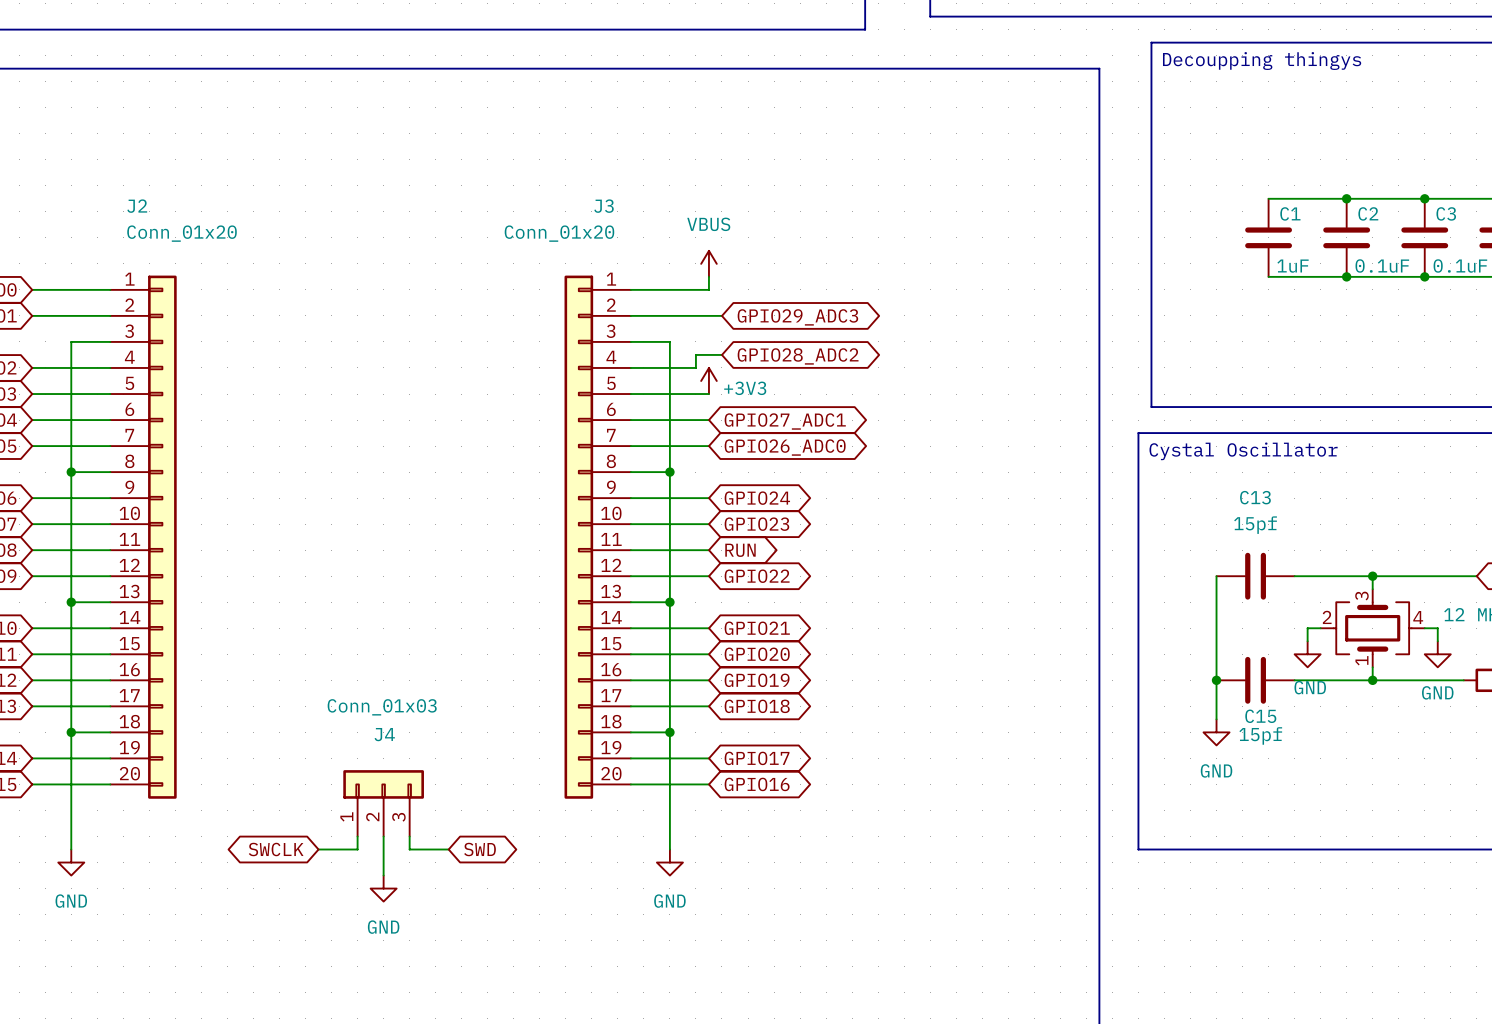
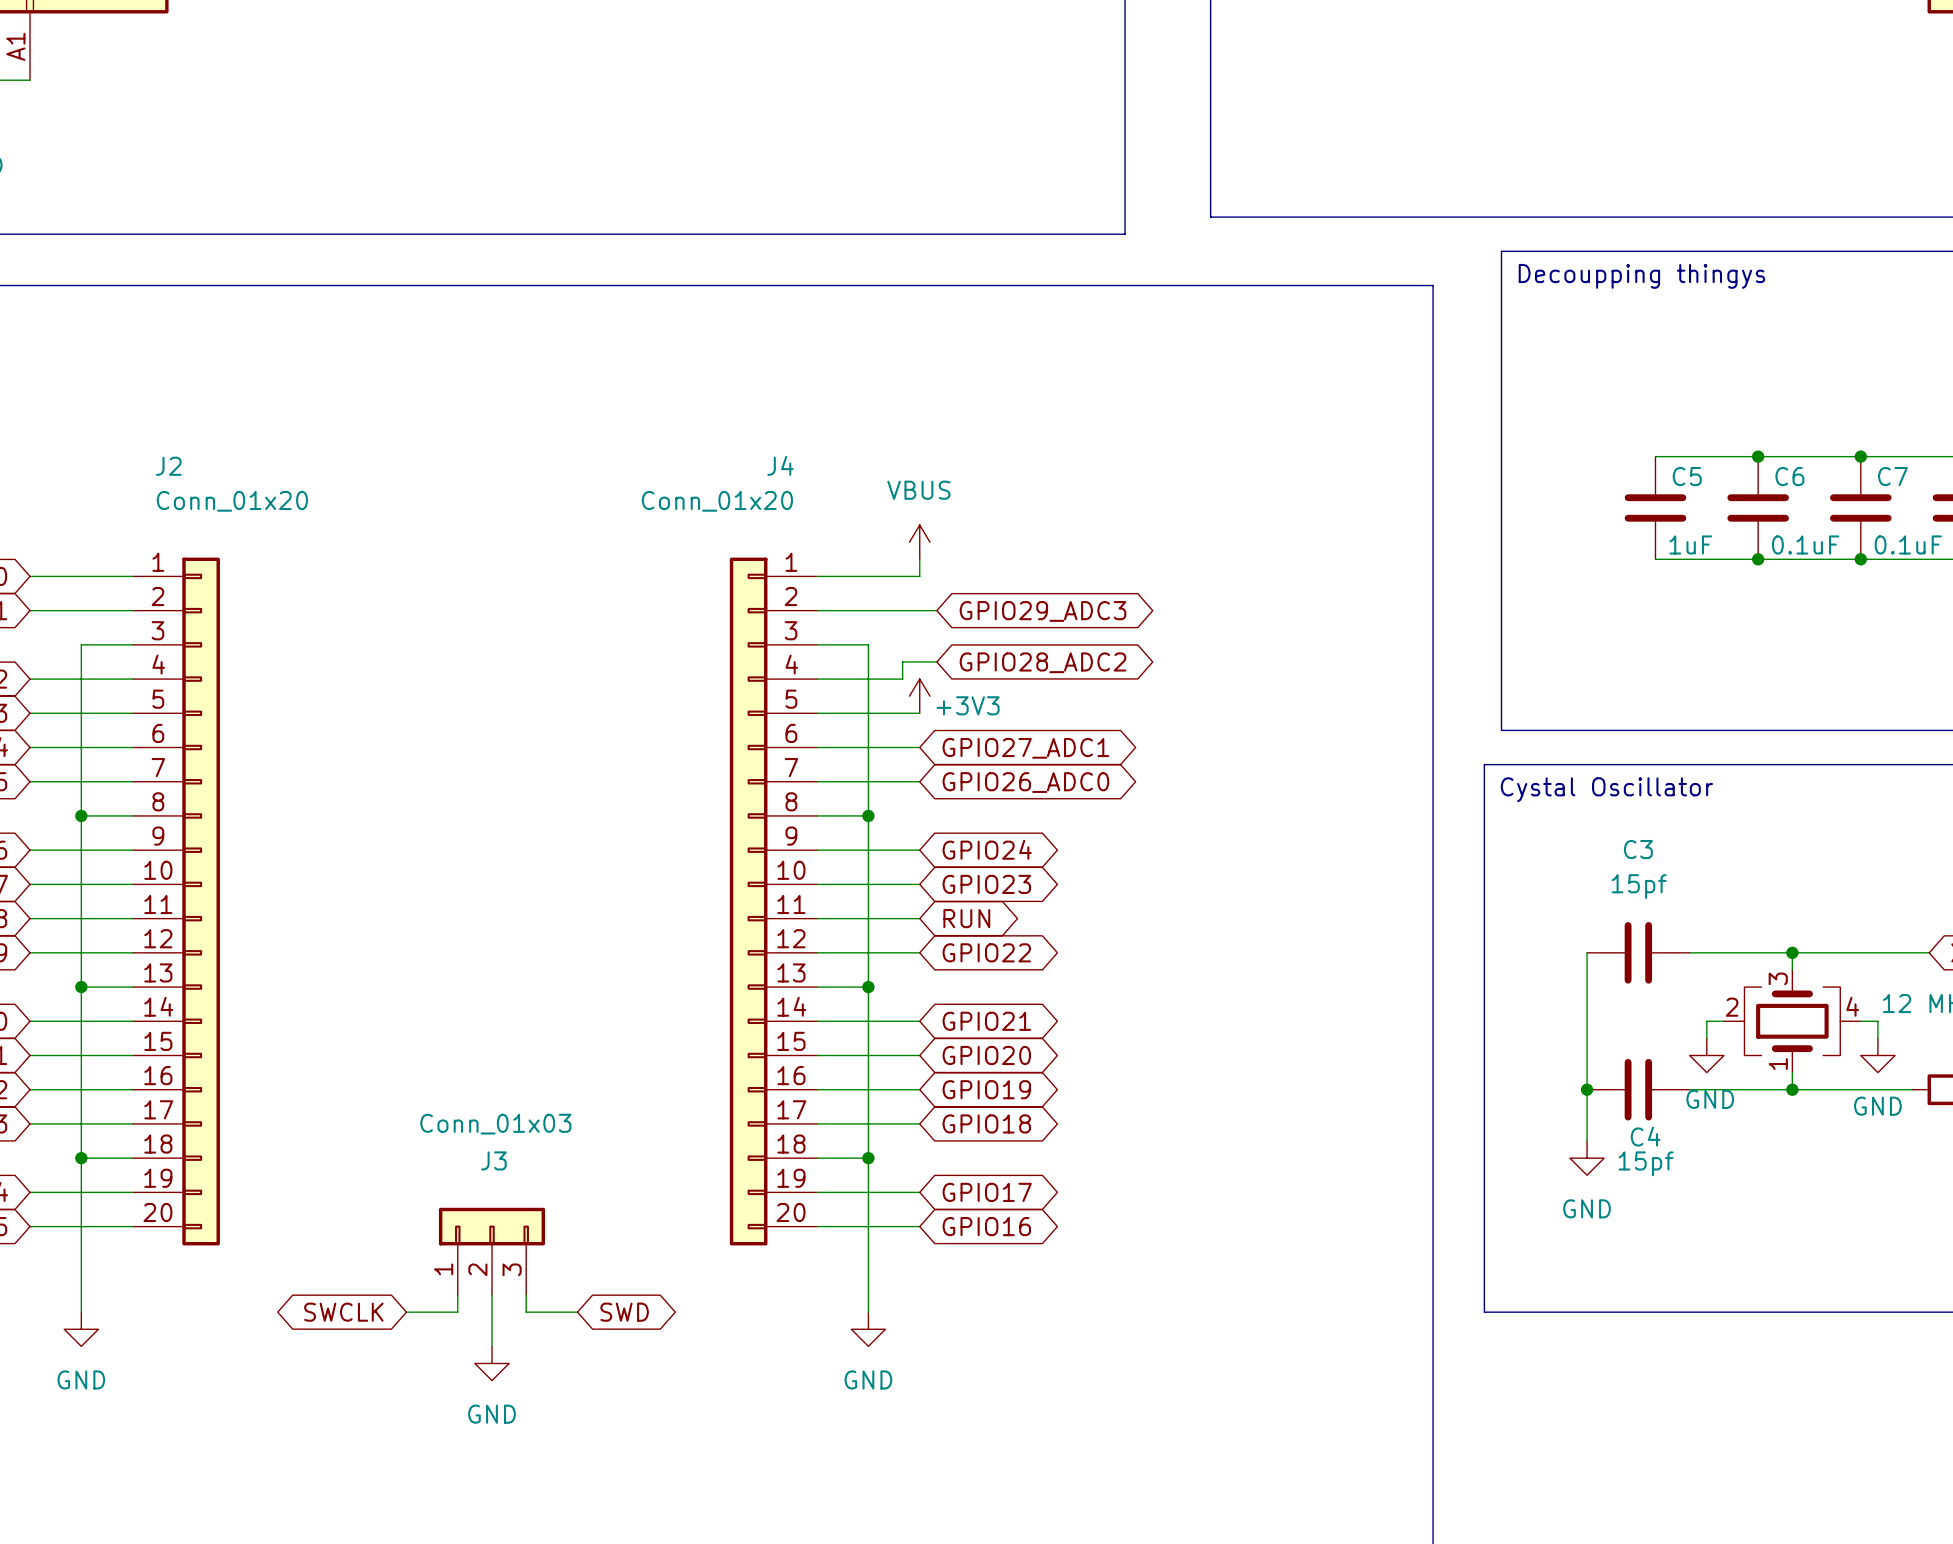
J3 name: J3 (604, 206) -> J4 (780, 465)
C1 name: C1 (1290, 213) -> C5 (1687, 476)
C2 name: C2 (1368, 213) -> C6 (1789, 476)
C3 name: C3 (1446, 213) -> C7 (1892, 476)
C13 name: C13 (1255, 497) -> C3 (1638, 849)
C15 name: C15 (1260, 716) -> C4 (1645, 1136)
J4 name: J4 (384, 734) -> J3 (493, 1160)

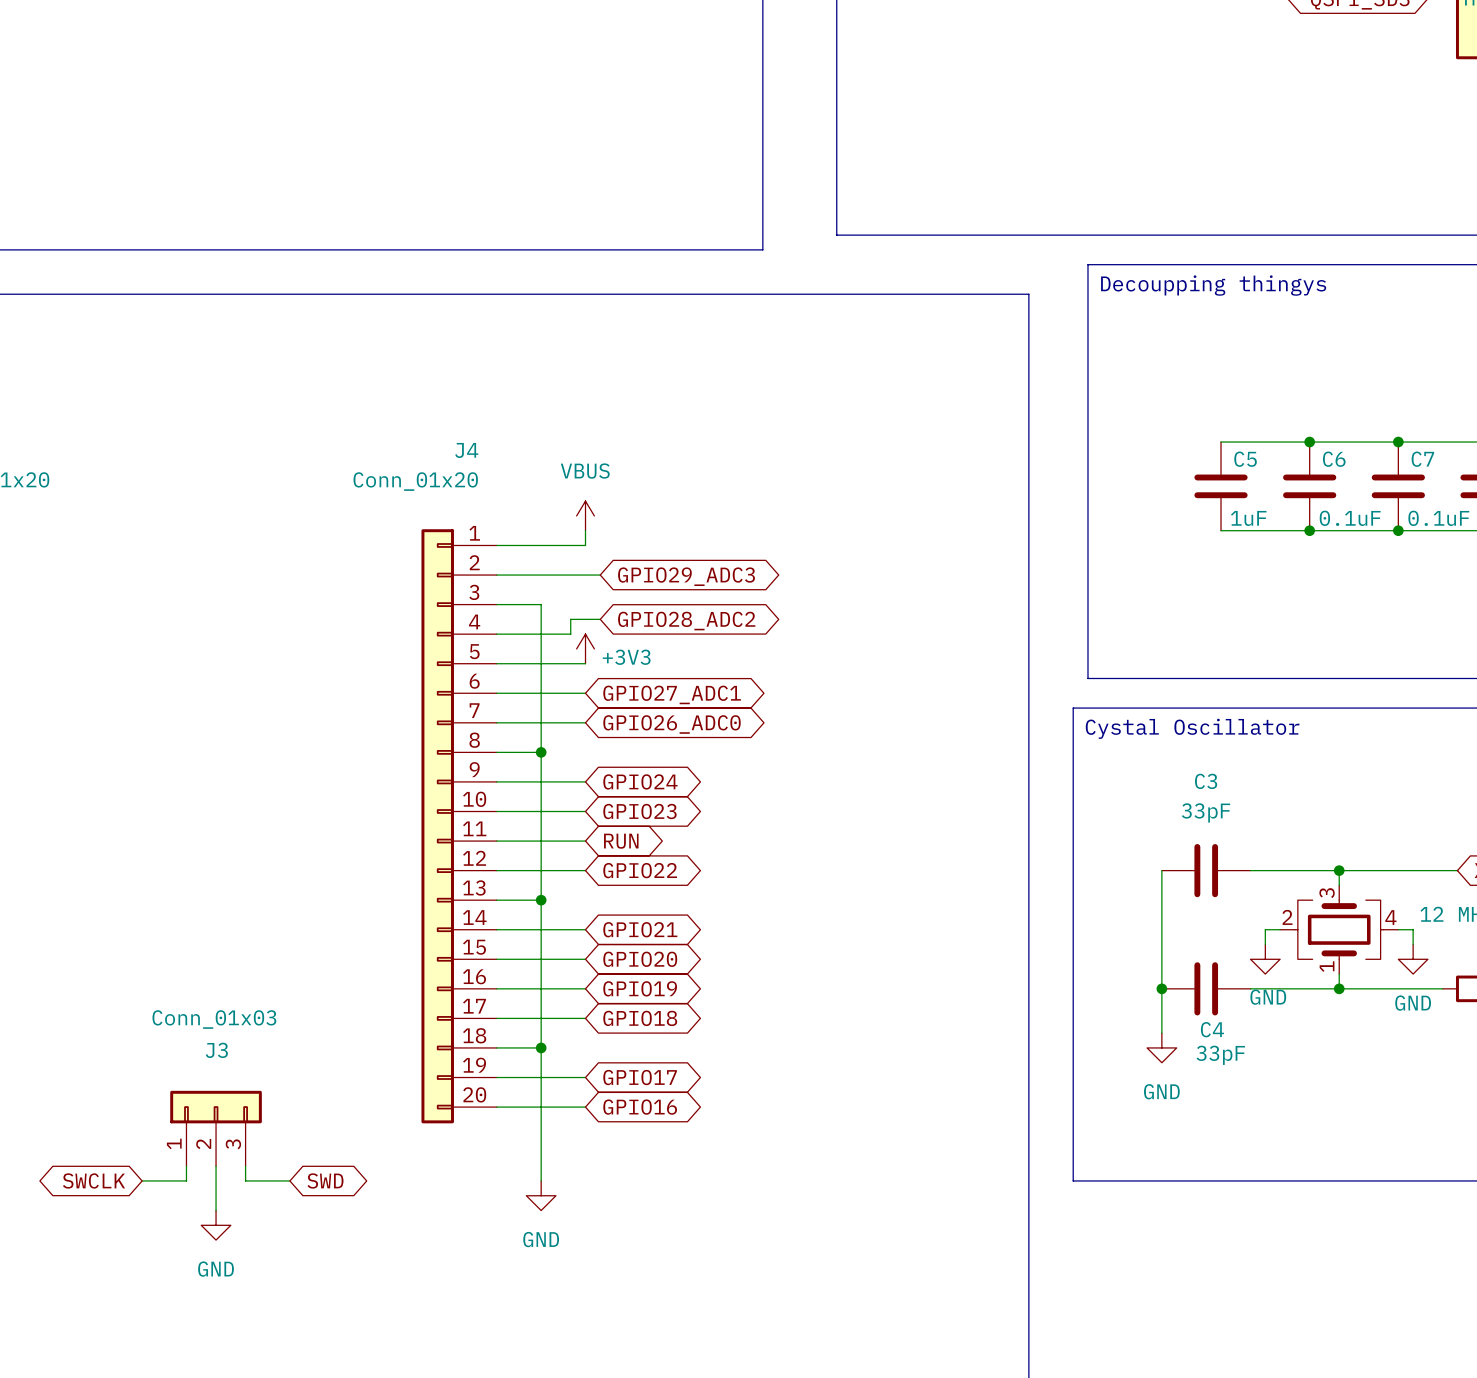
C3 value: 15pf (1639, 886) -> 33pF (1205, 812)
C4 value: 15pf (1646, 1163) -> 33pF (1220, 1055)

